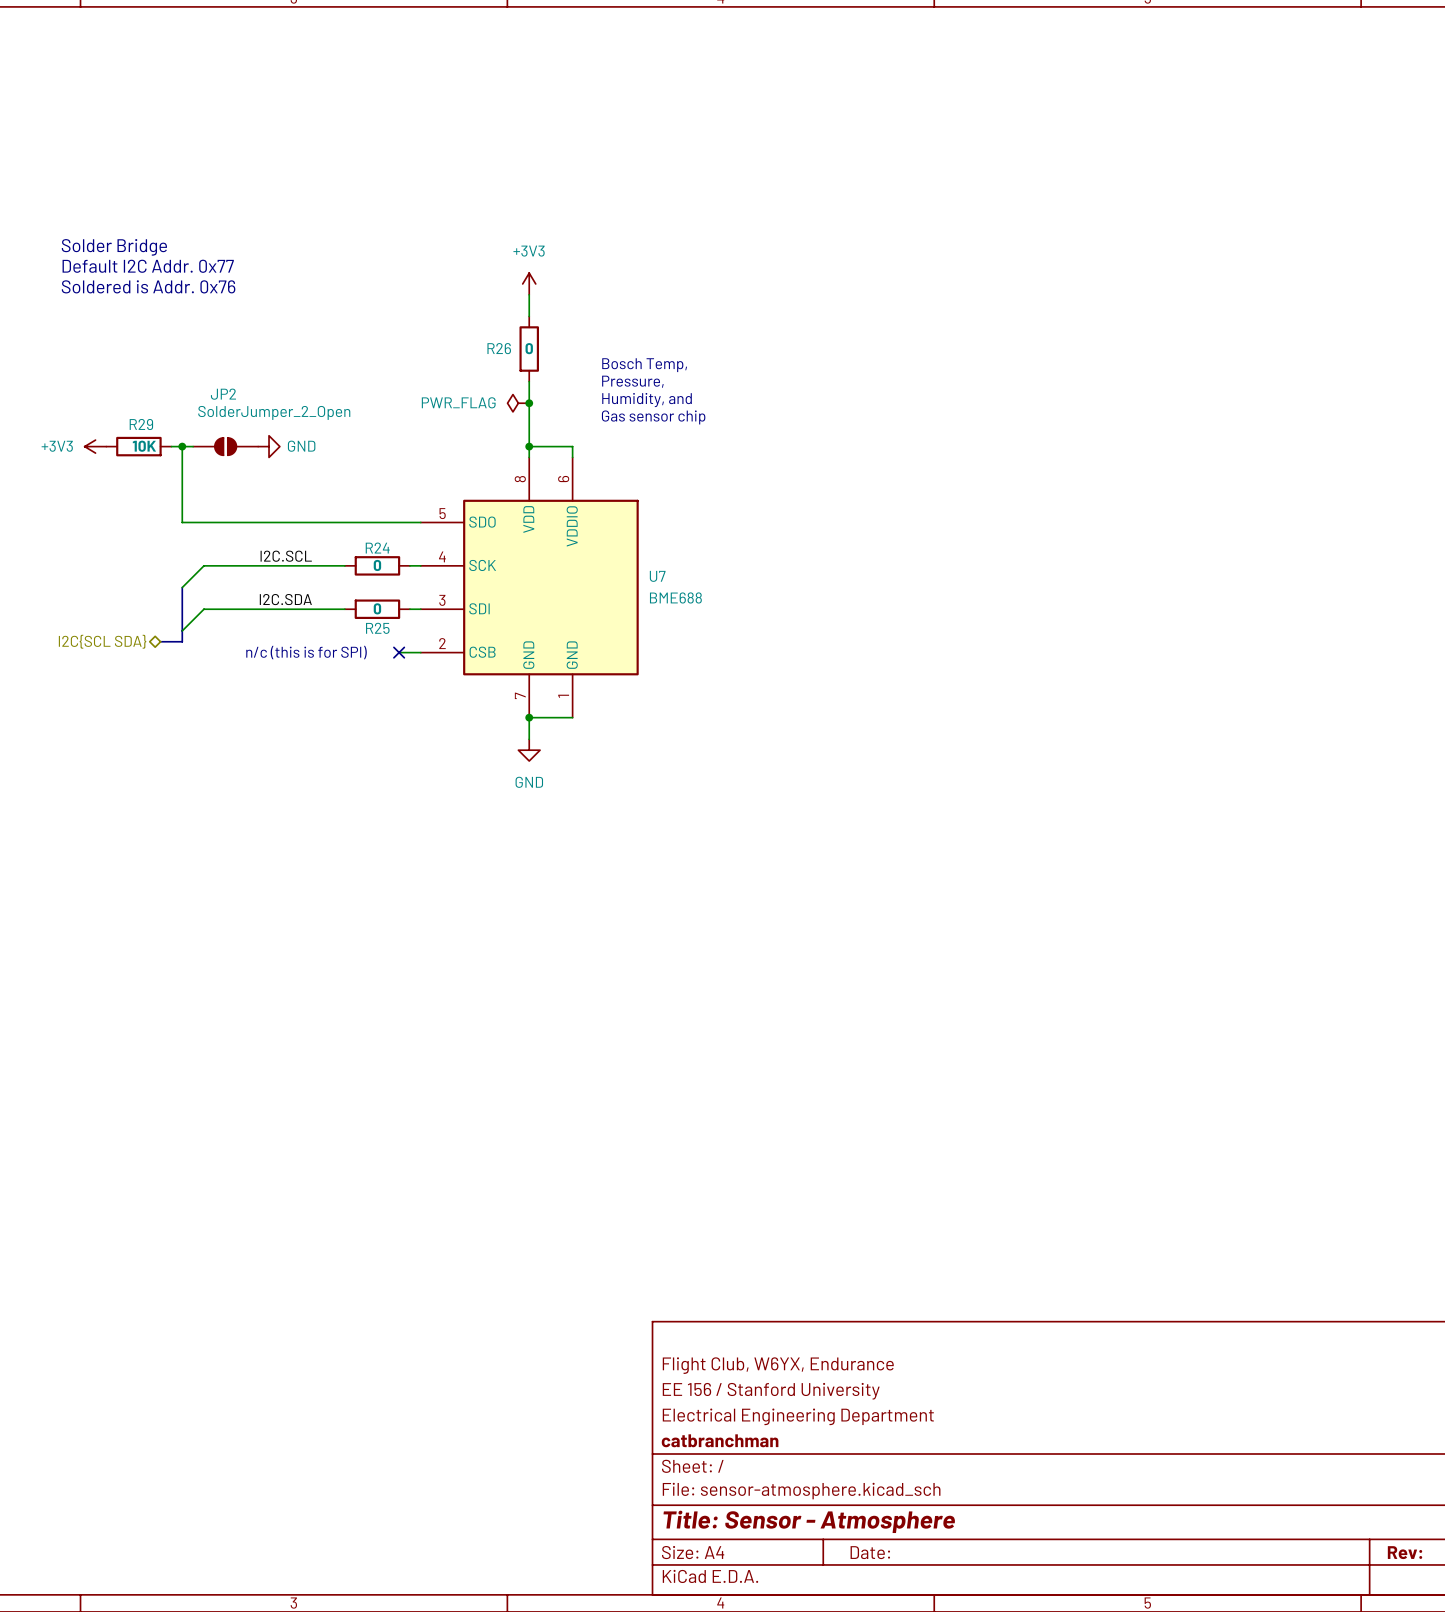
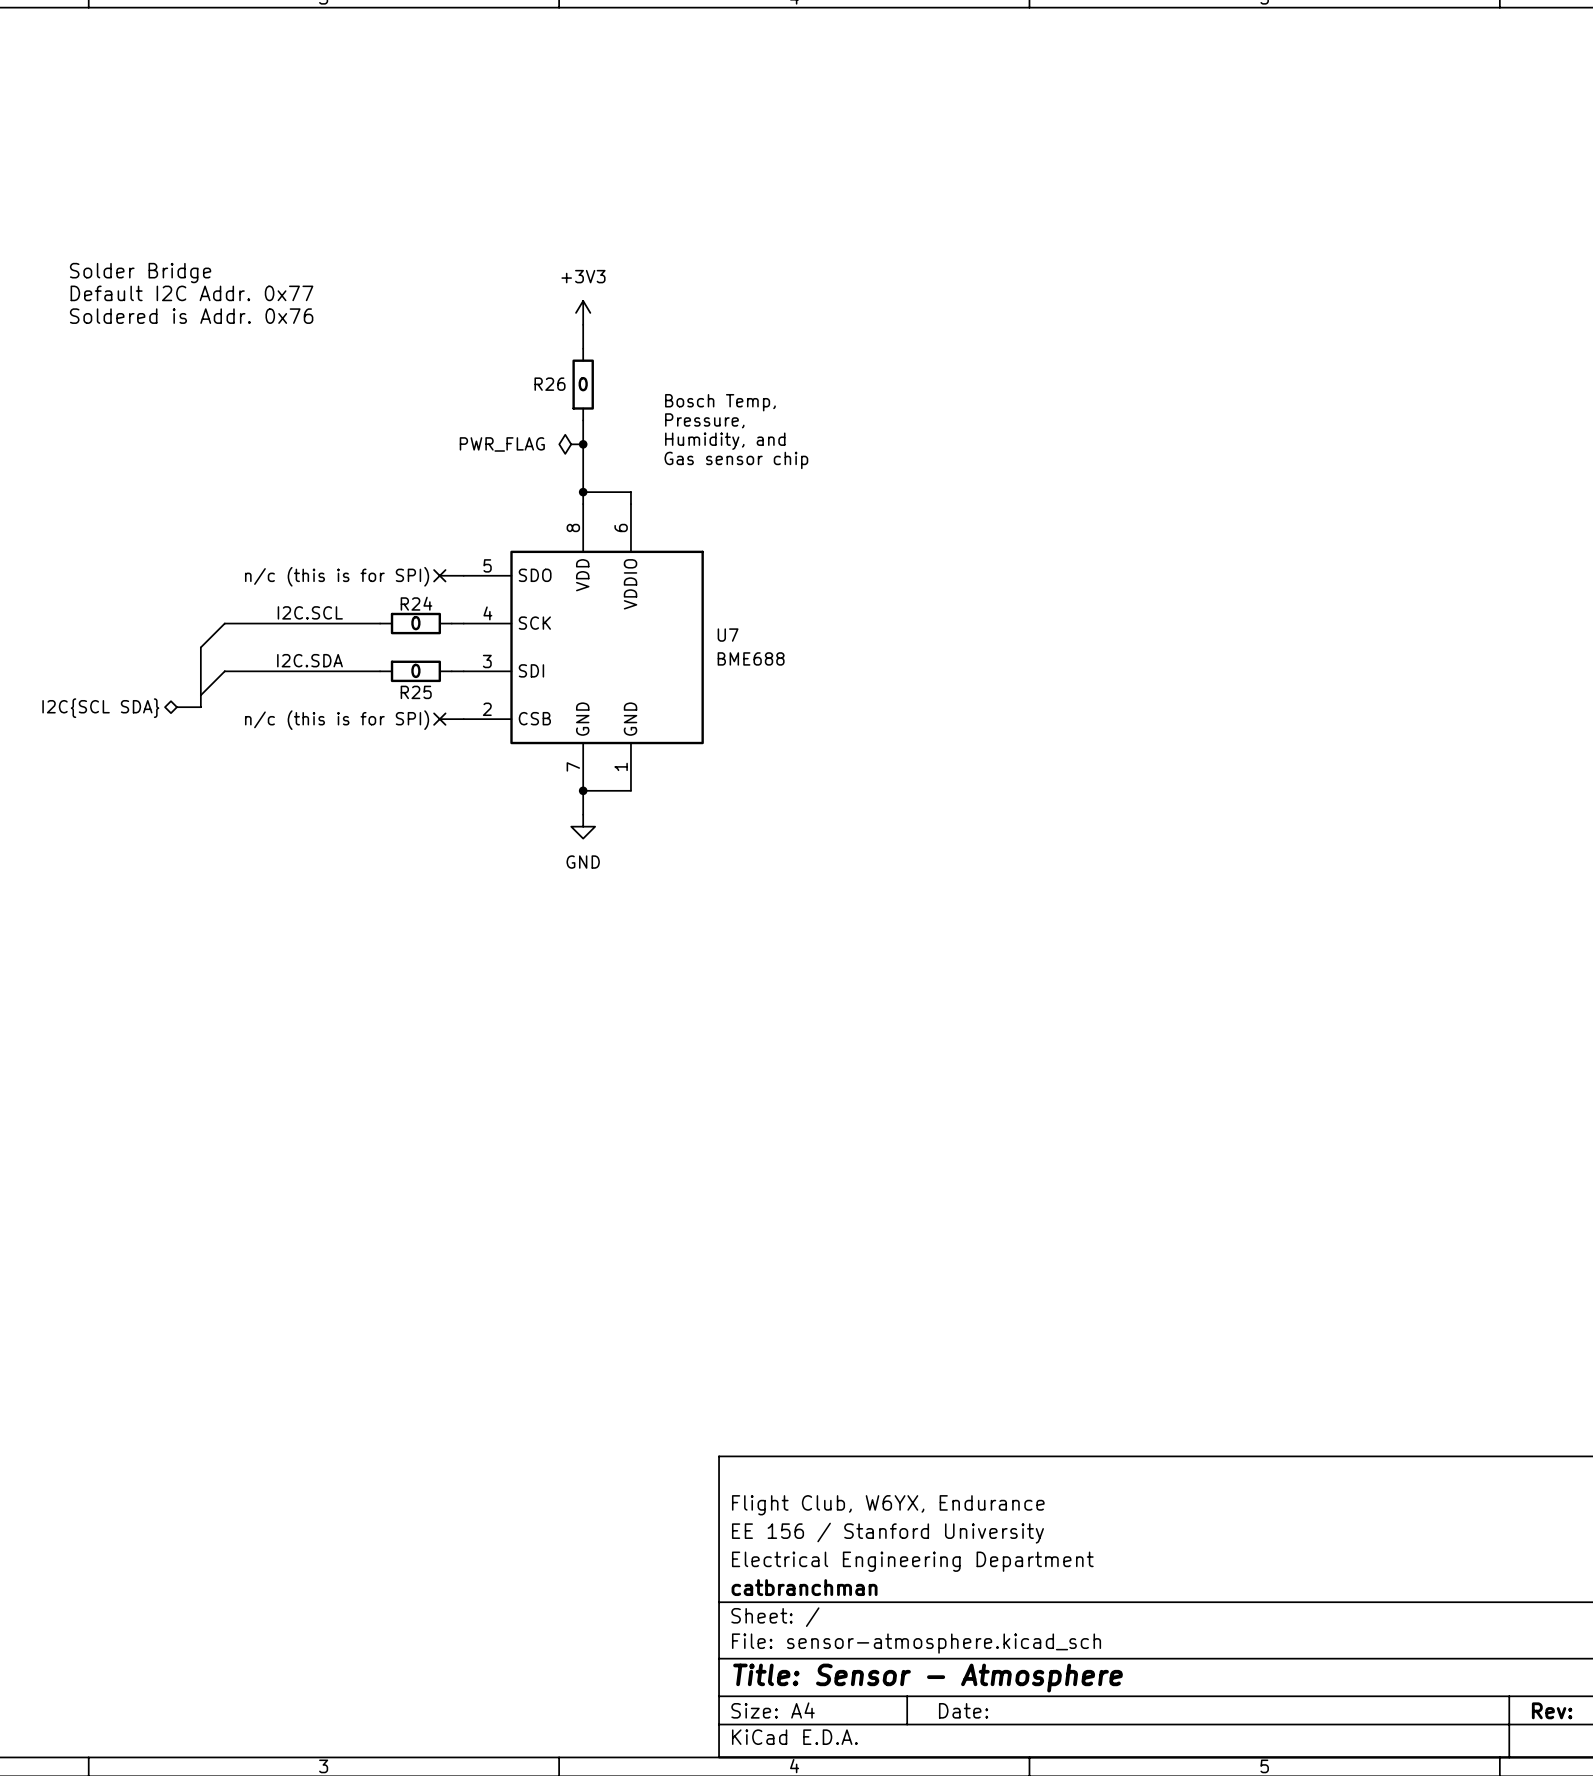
power symbol: +3V3 (95, 446) -> none
R29: 10K (138, 446) -> none
wire: (171, 446) (193, 446) -> none
wire: (182, 446) (182, 522) (399, 522) -> none
junction: (182, 446) -> none
JP2: SolderJumper_2_Open (225, 446) -> none
power symbol: GND (269, 446) -> none
text: none -> n/c (this is for SPI) (337, 576)
no-connect mark: none -> (439, 575)

